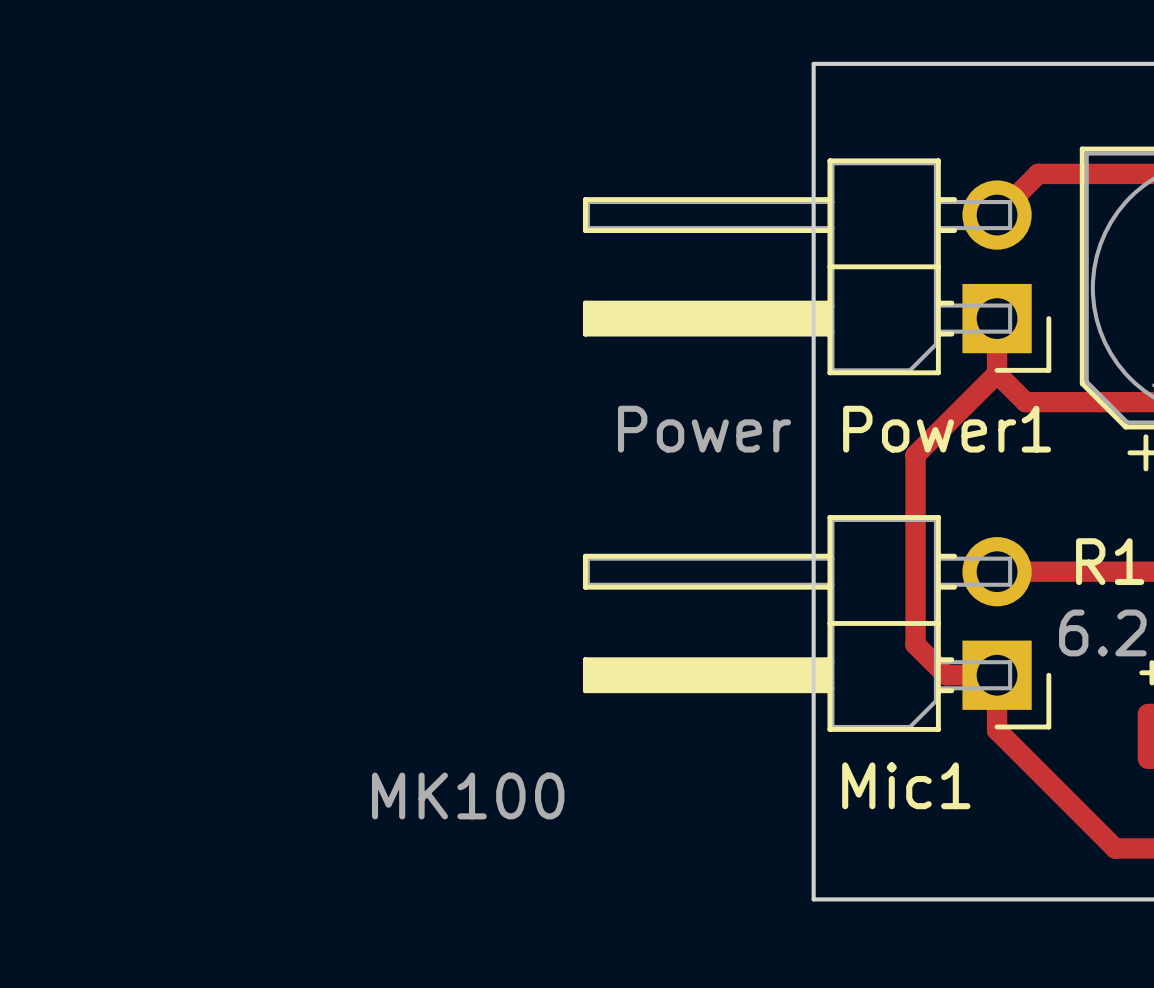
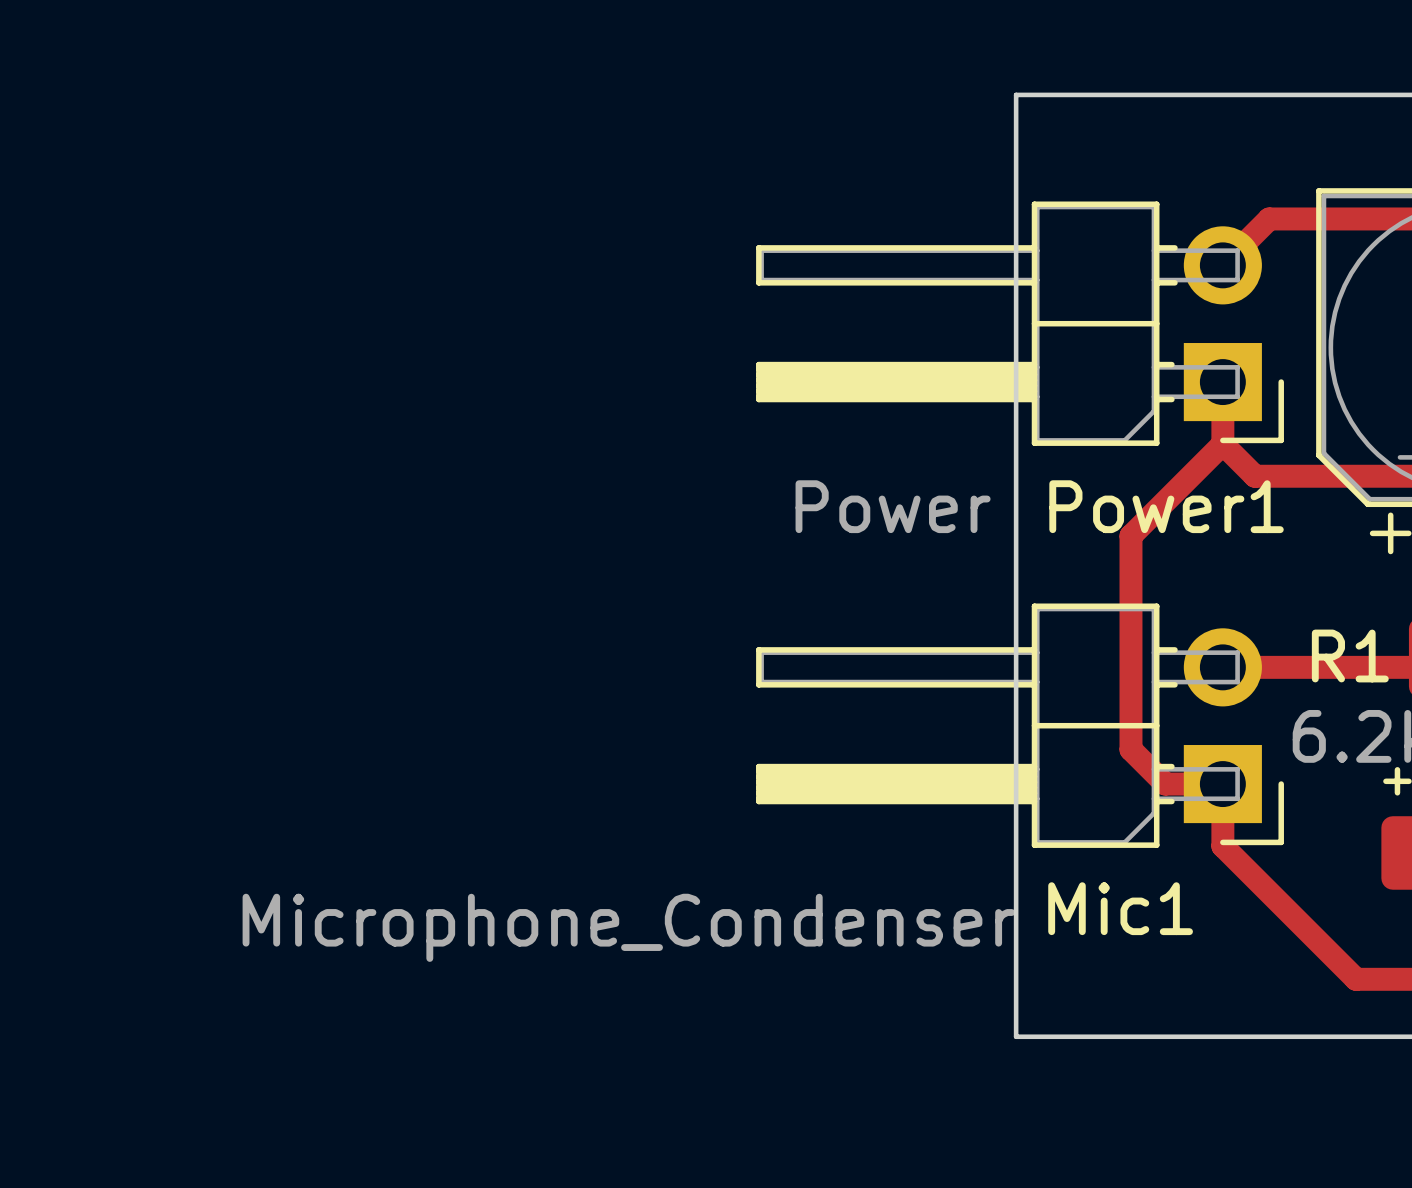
Mic1 value: MK100 (468, 795) -> Microphone_Condenser (628, 927)

